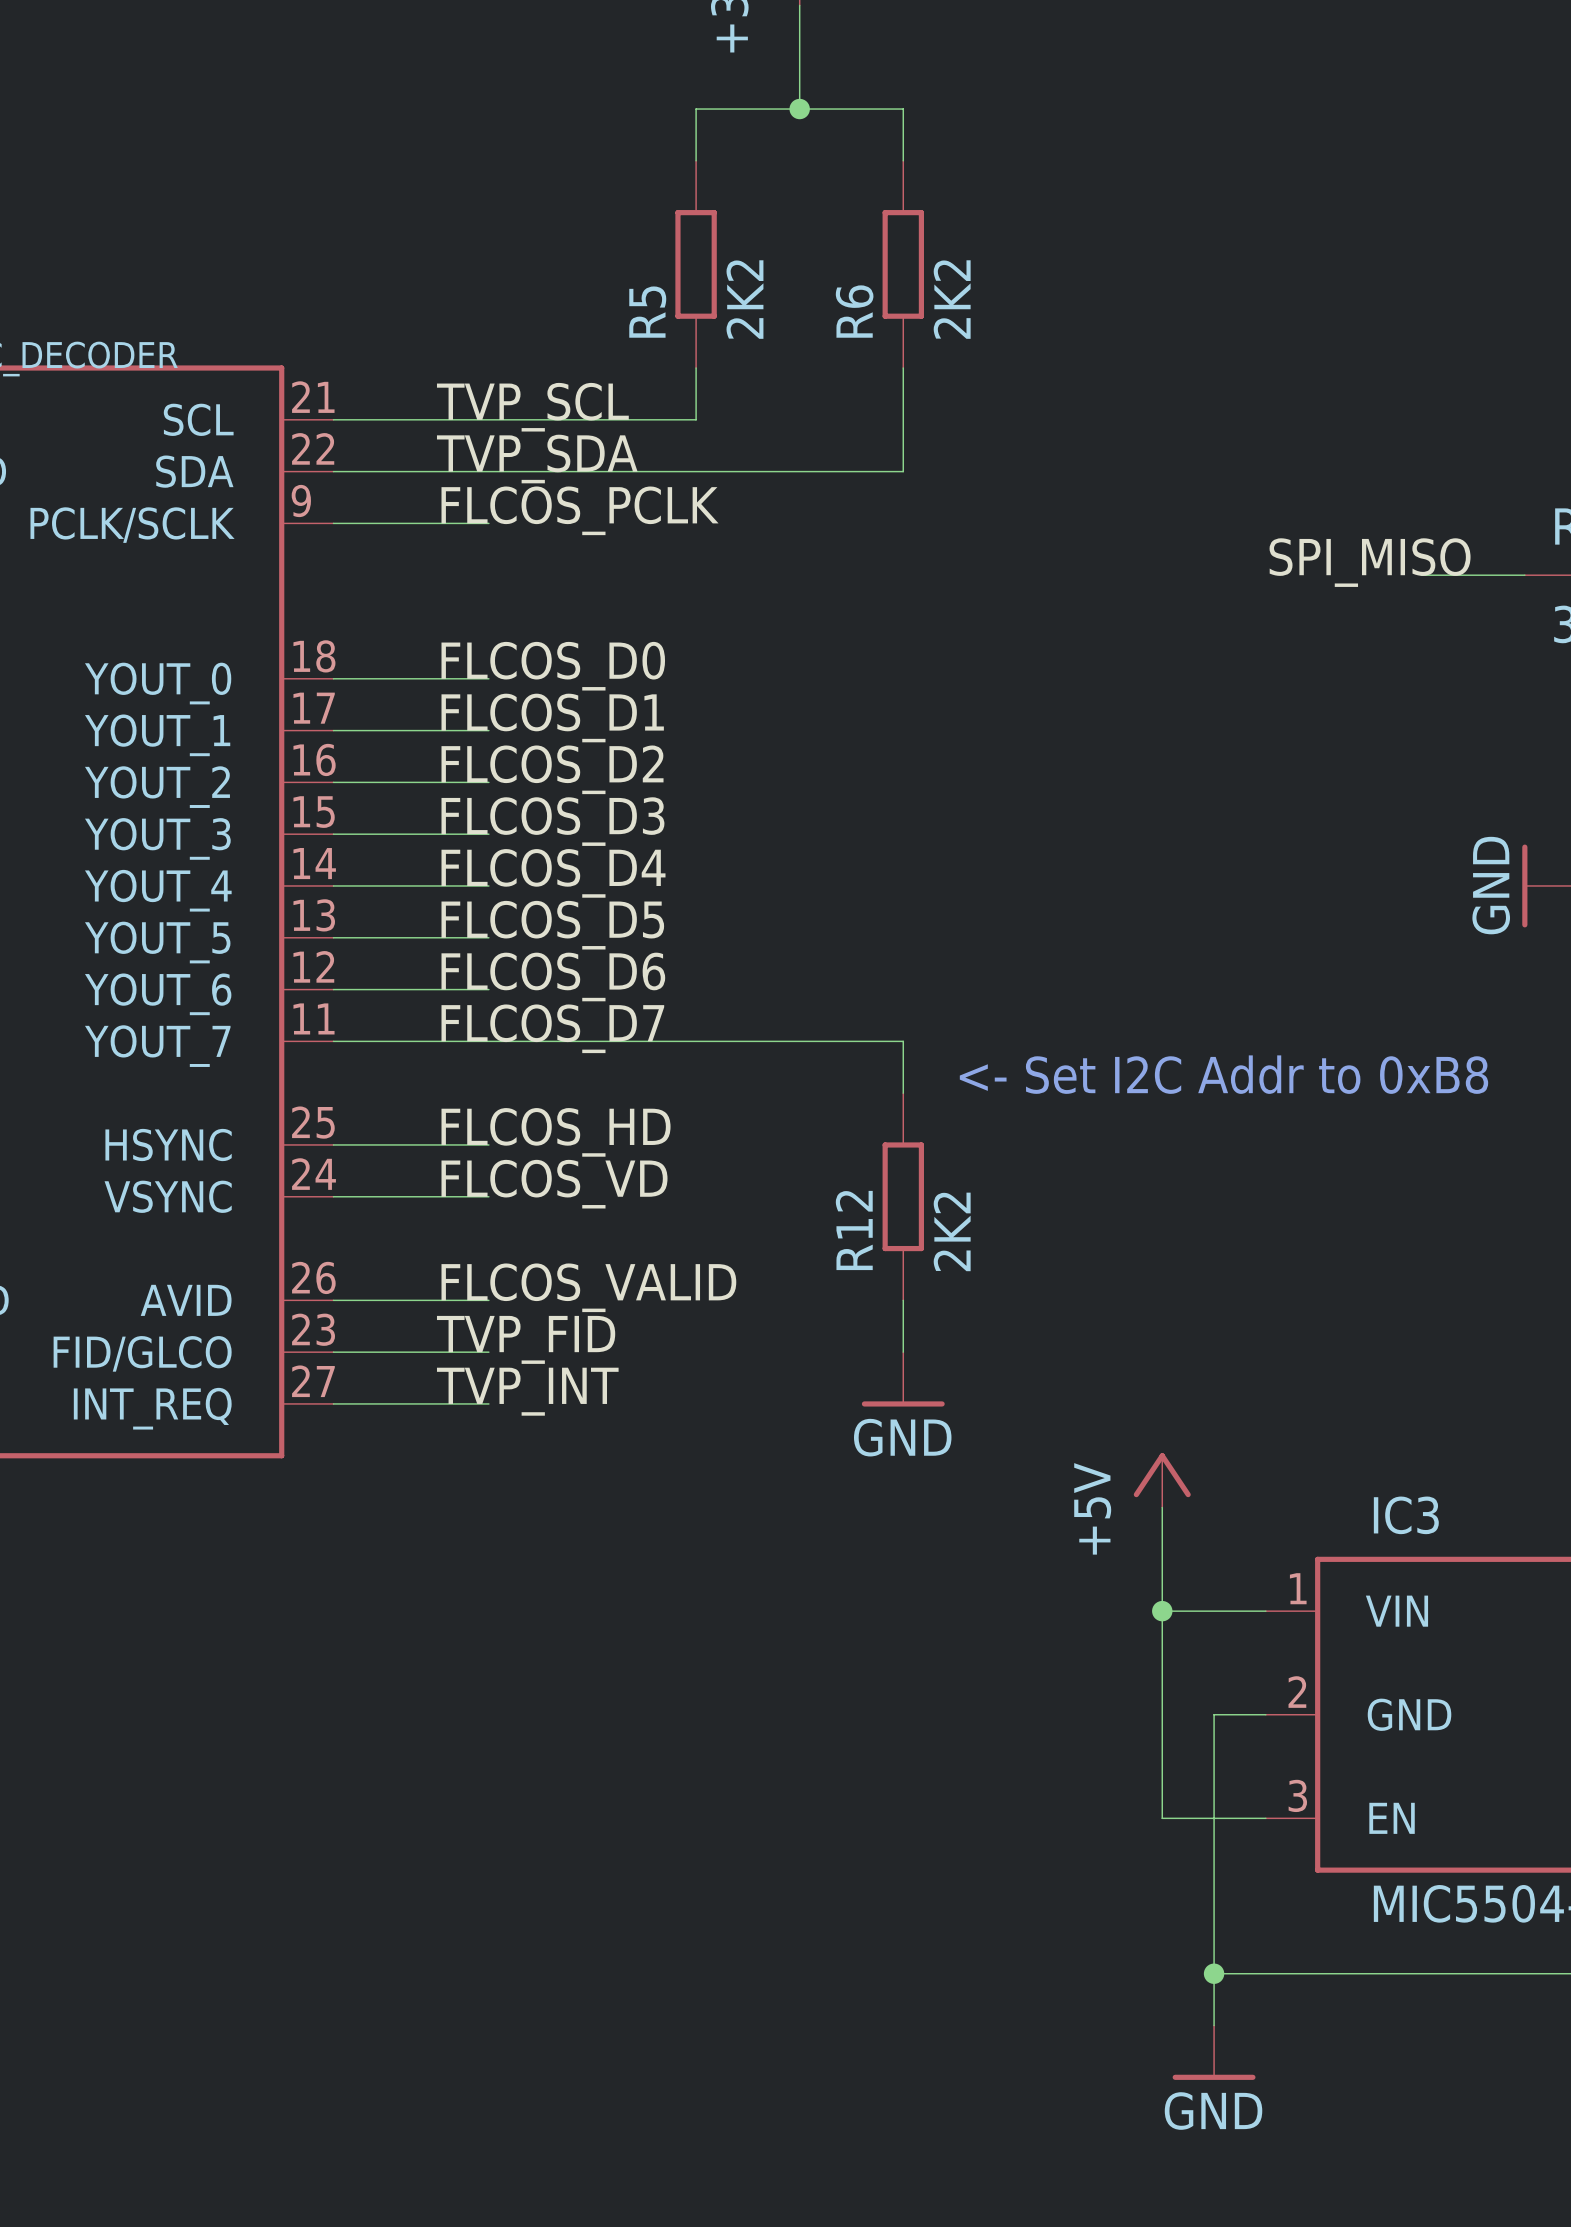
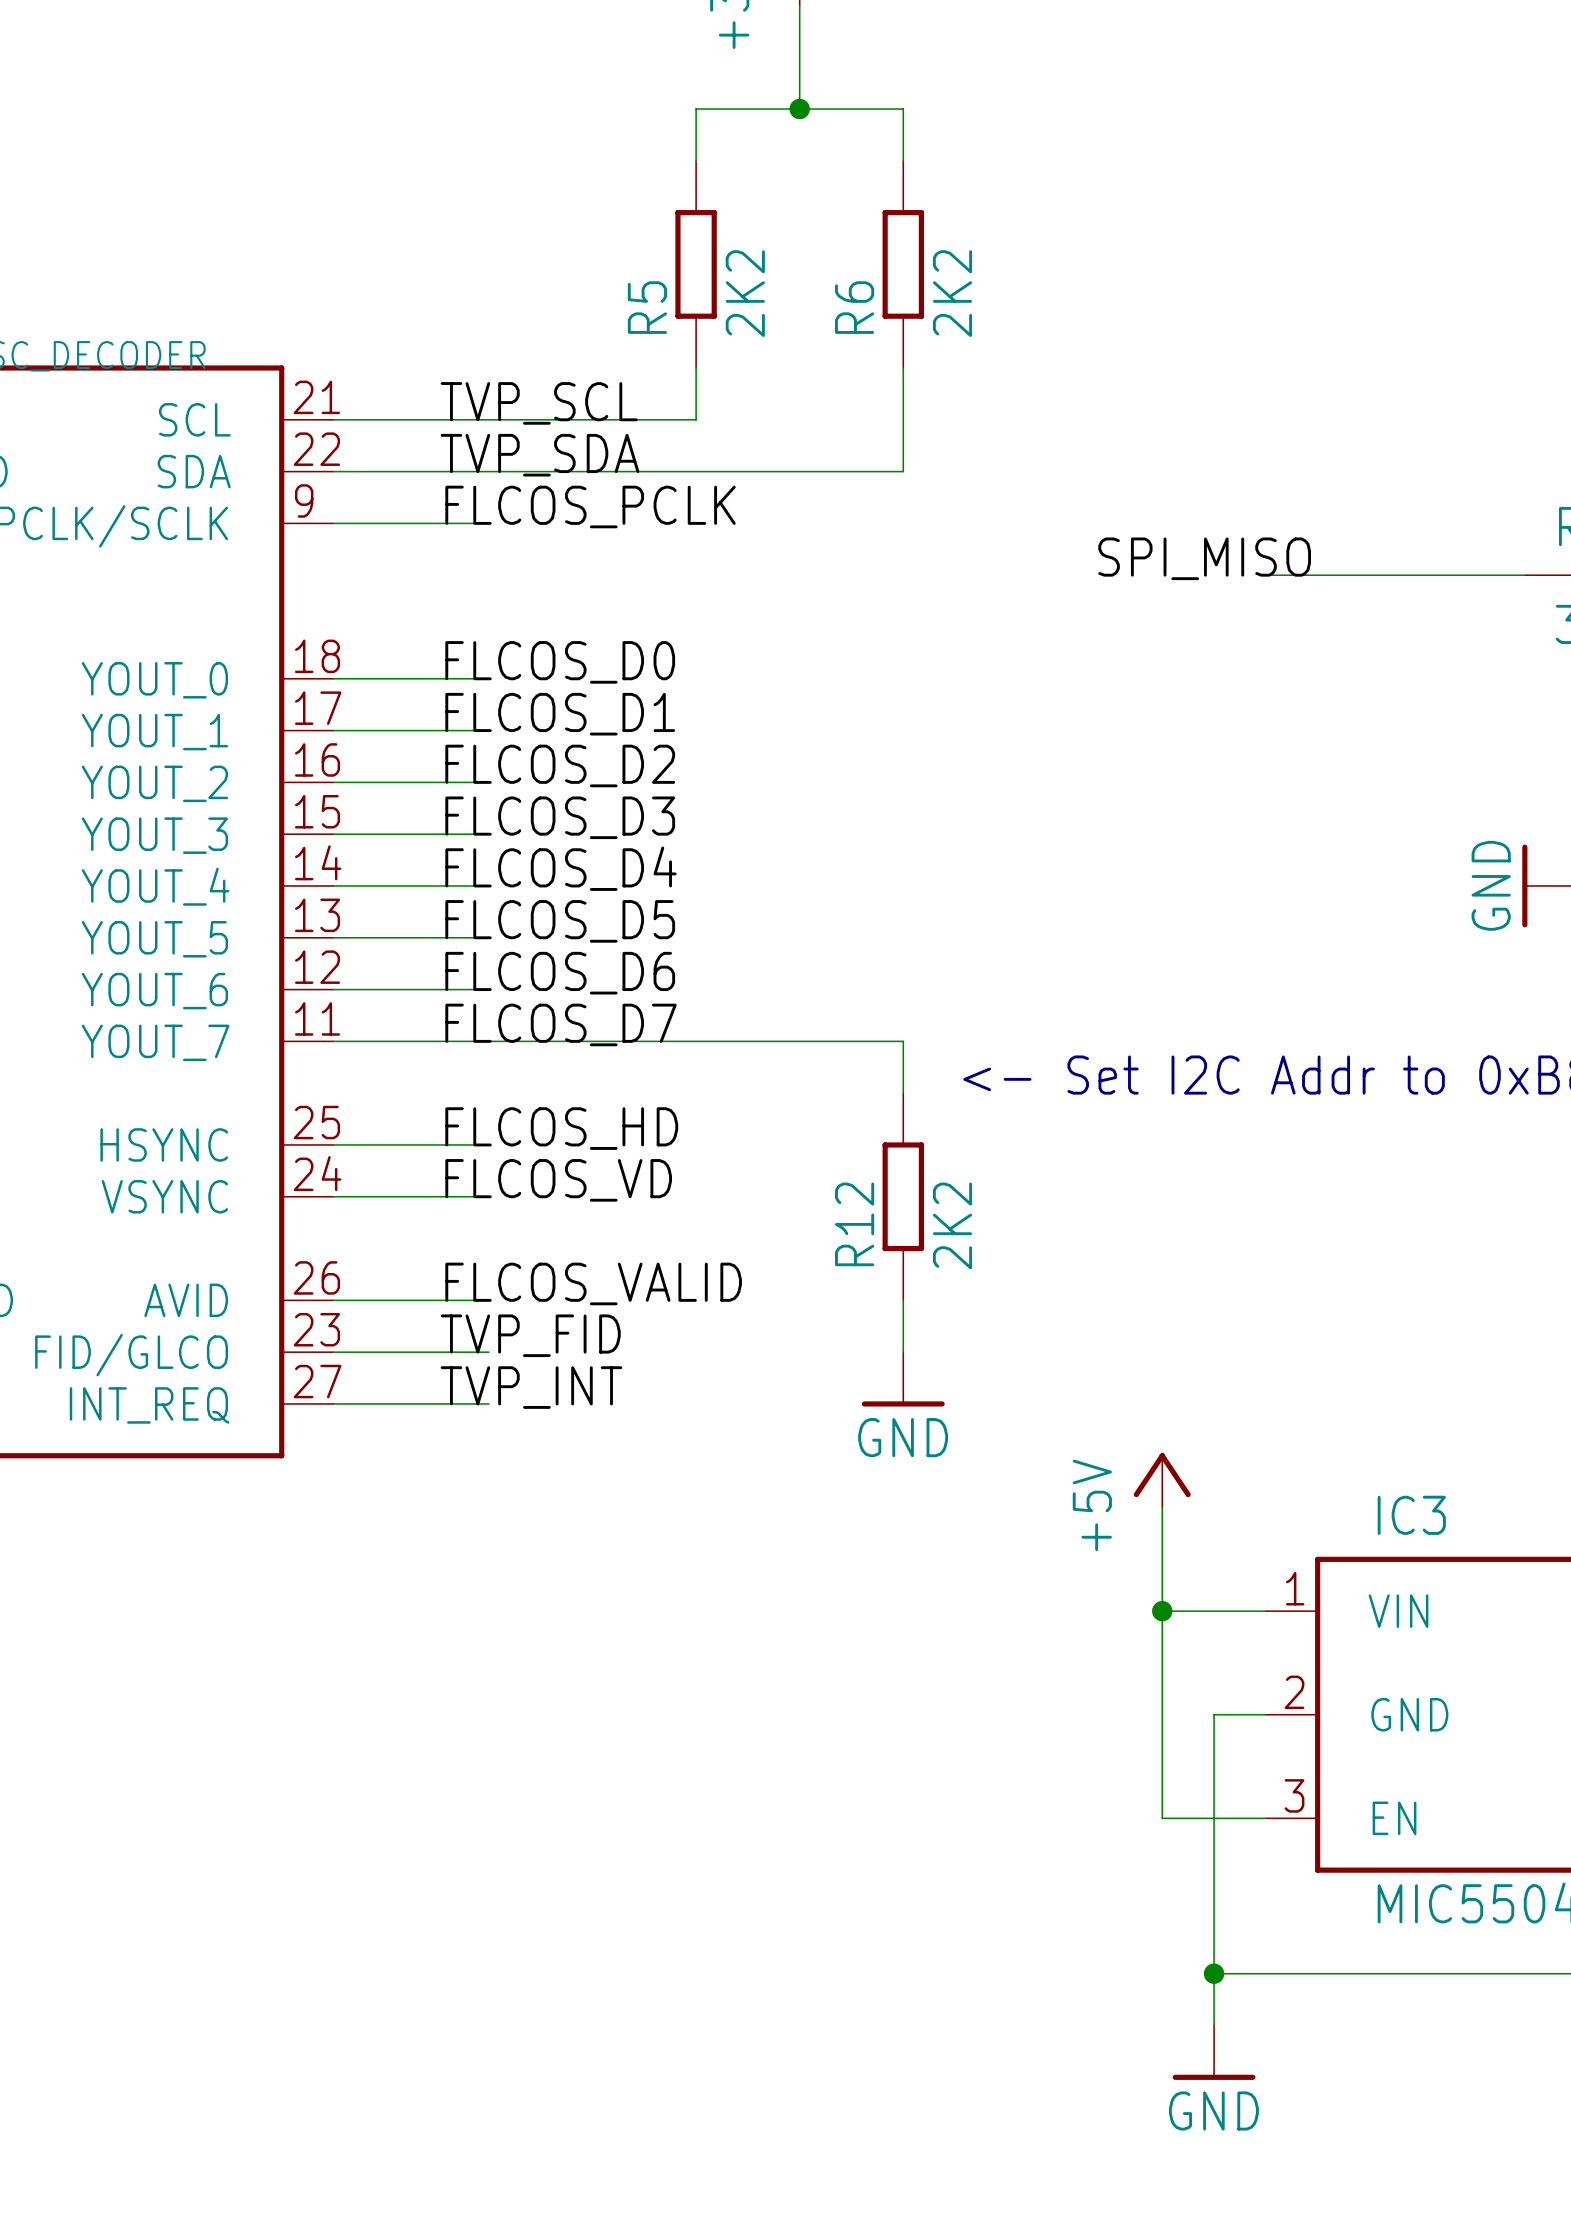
label position: SPI_MISO (1370, 562) -> SPI_MISO (1204, 558)
wire: none -> (1265, 575) (1421, 575)

